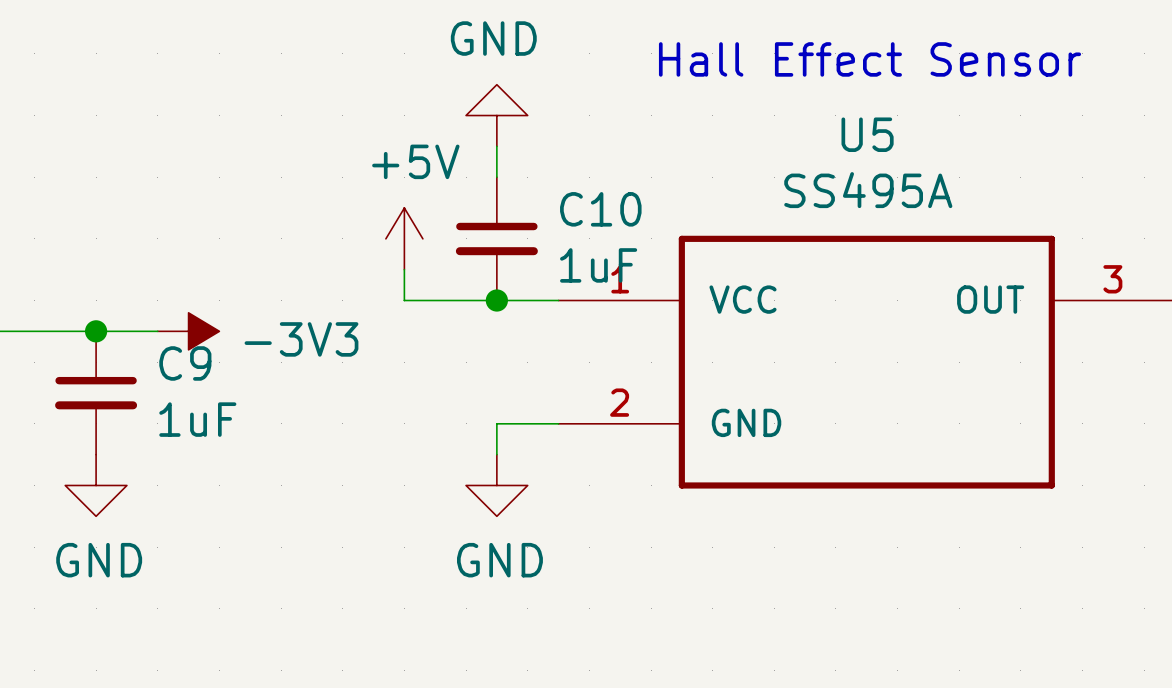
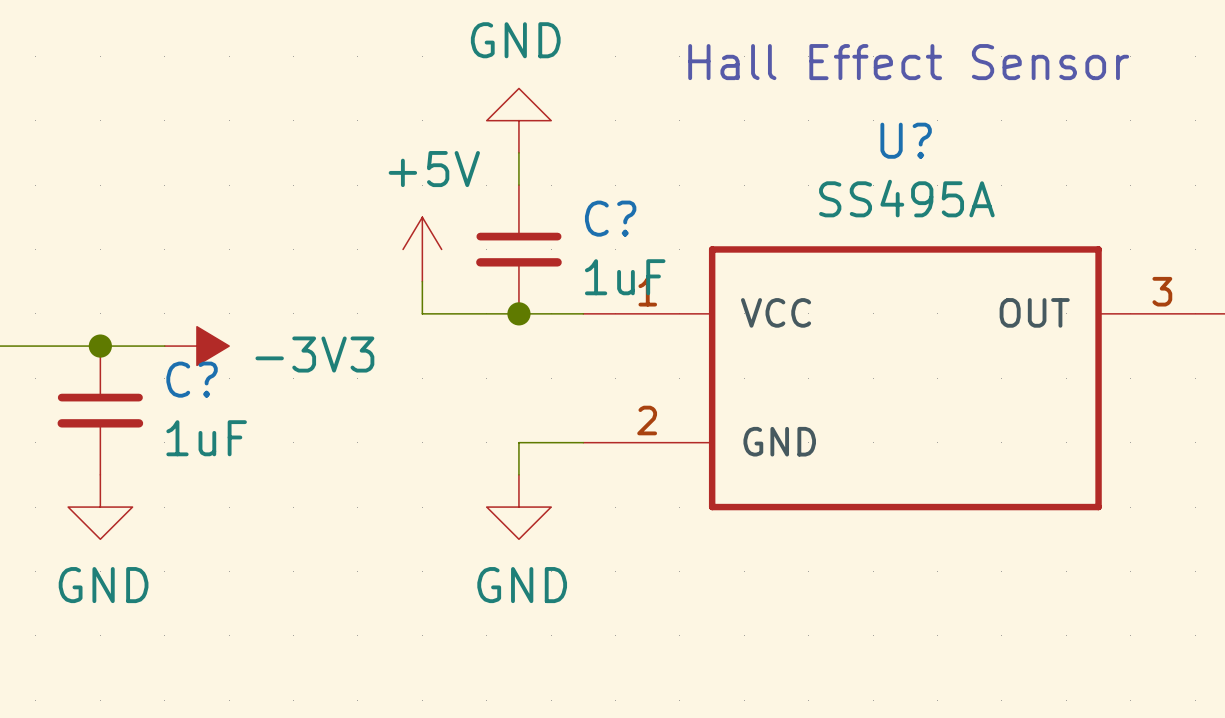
U5 name: U5 (867, 134) -> U? (906, 140)
C10 name: C10 (600, 209) -> C? (610, 218)
C9 name: C9 (185, 363) -> C? (192, 379)

